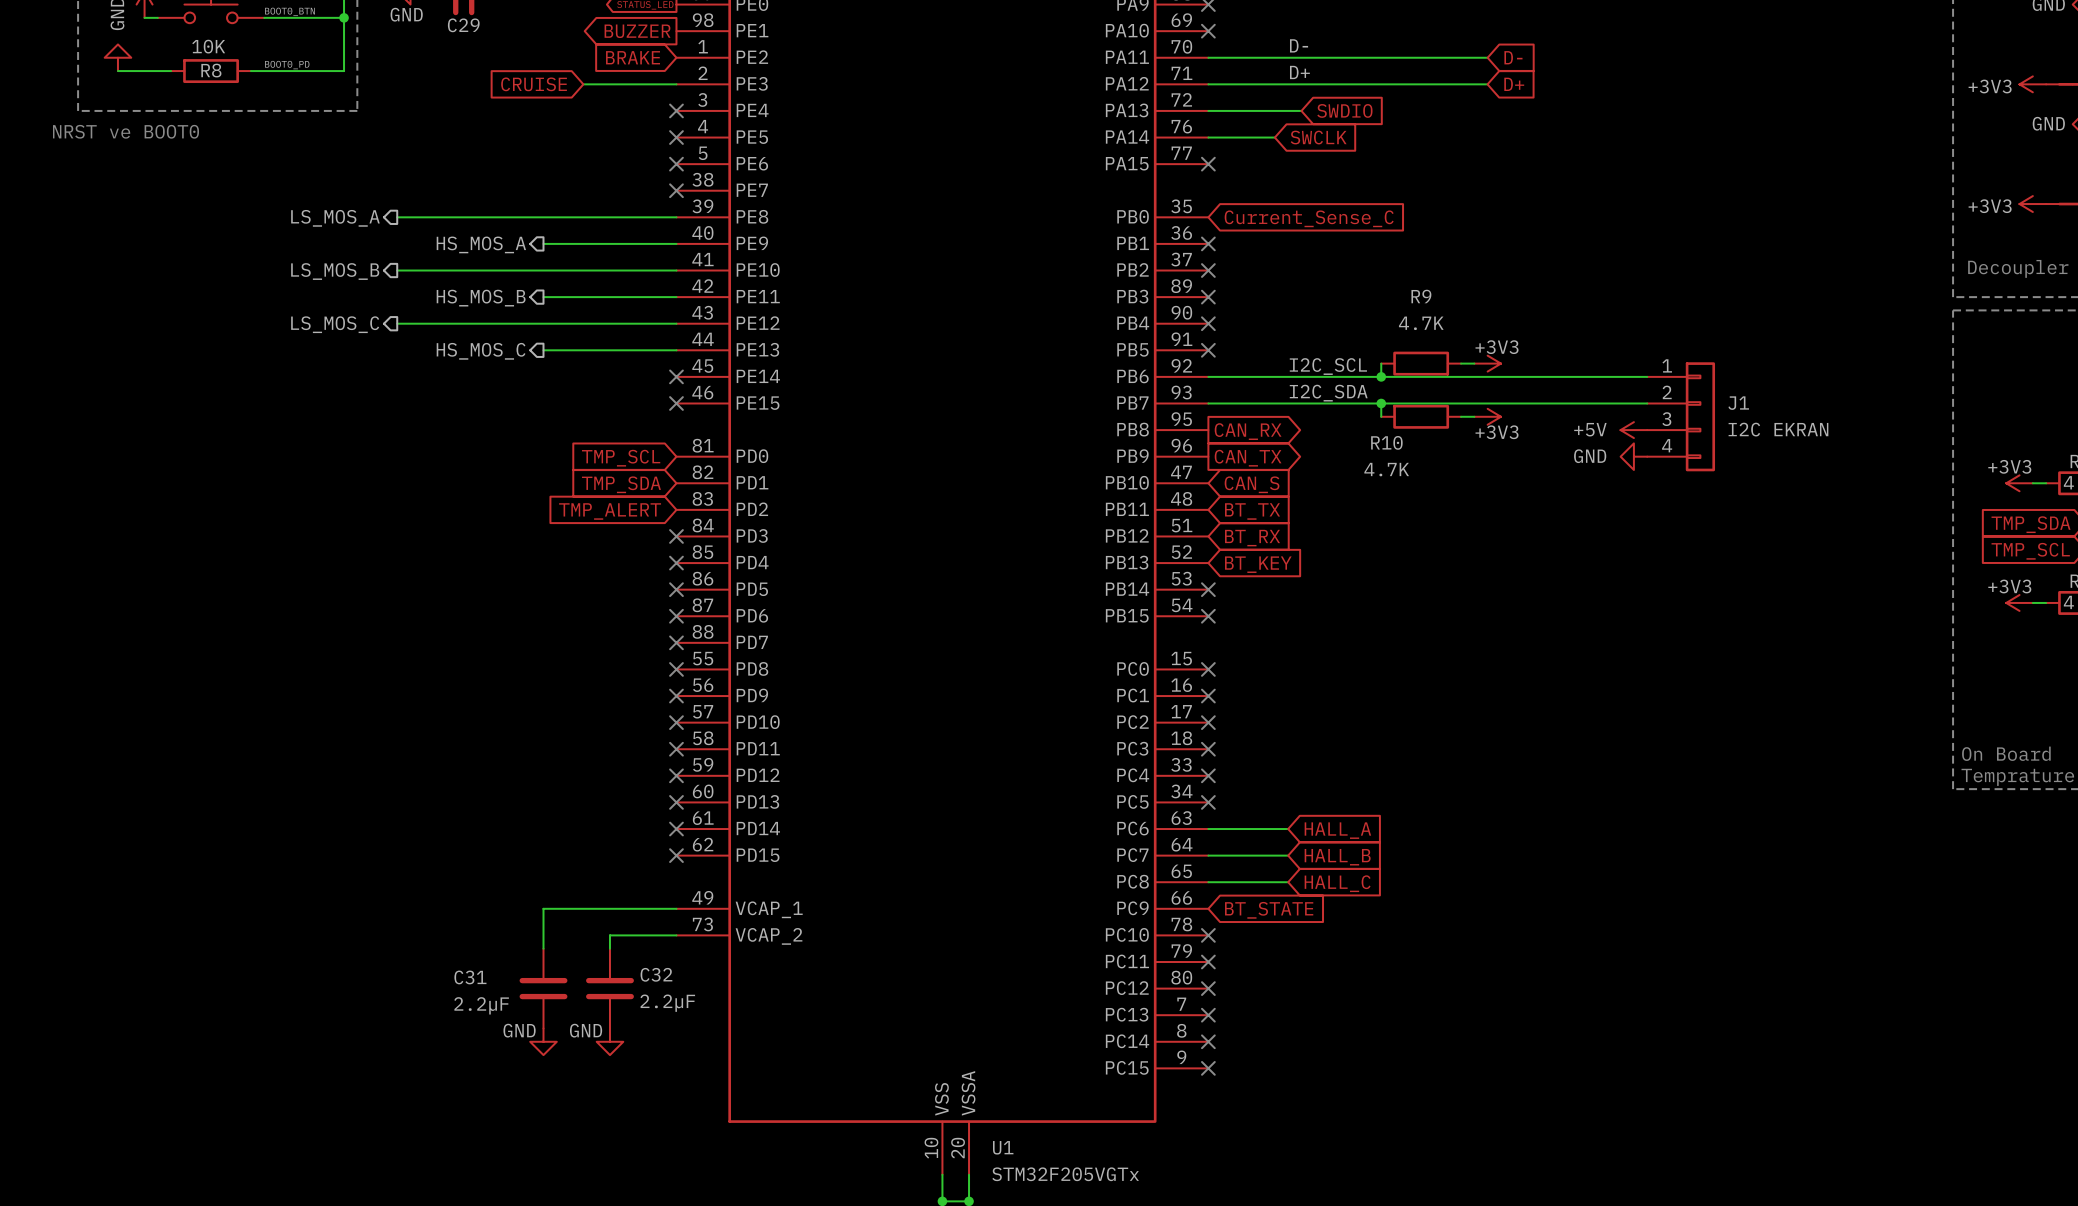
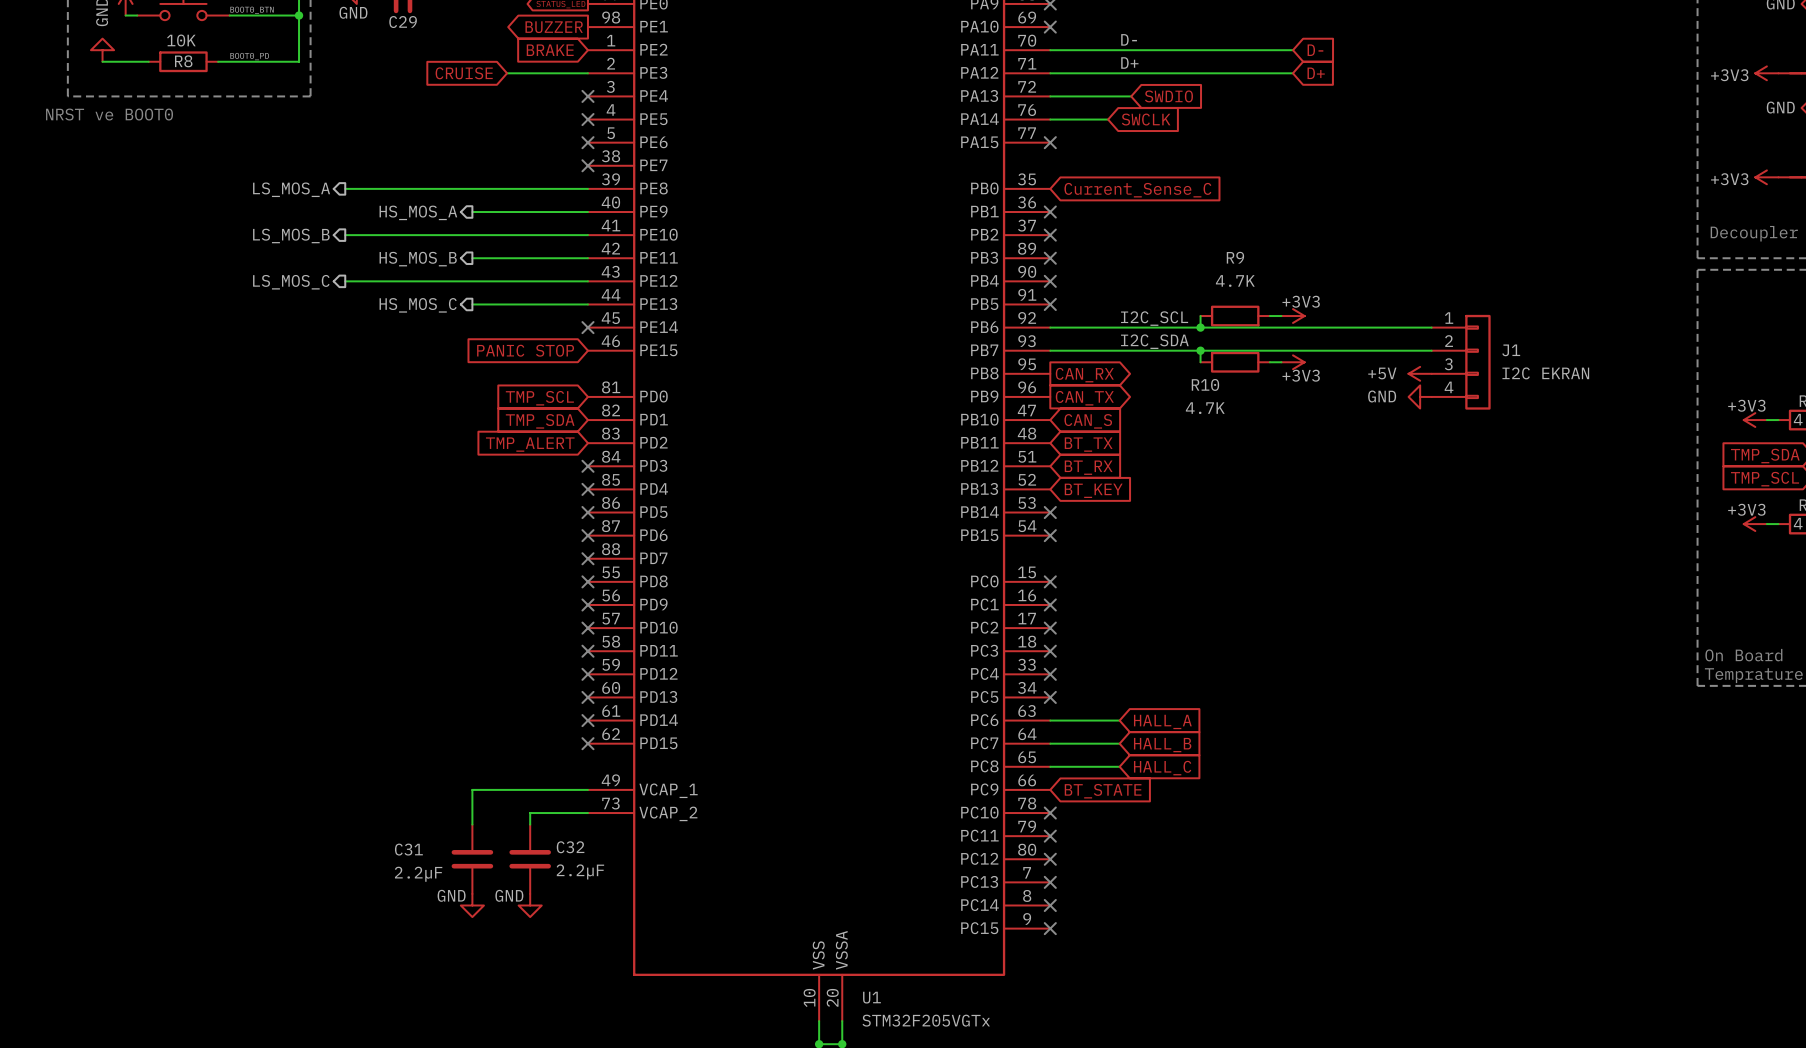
global label: none -> PANIC STOP (525, 350)
no-connect mark: (676, 403) -> none

